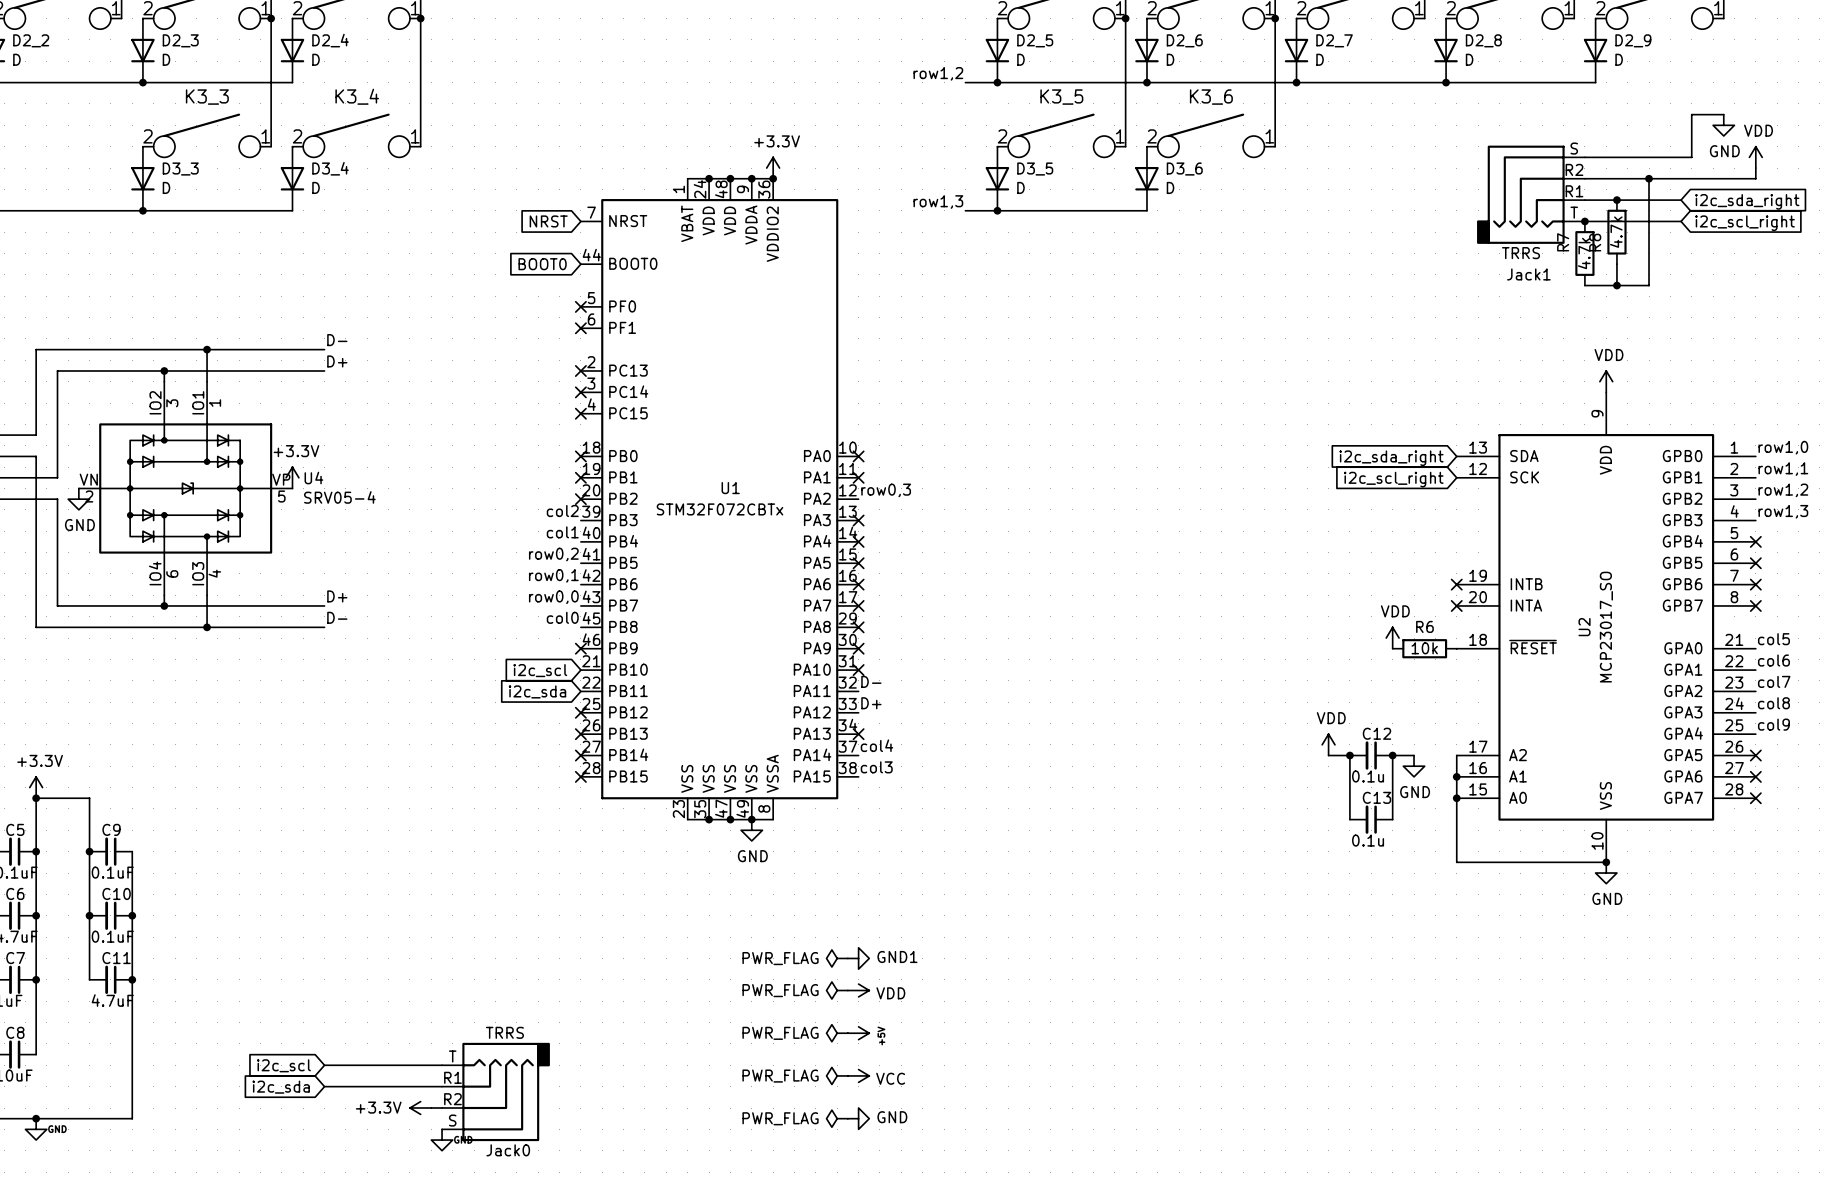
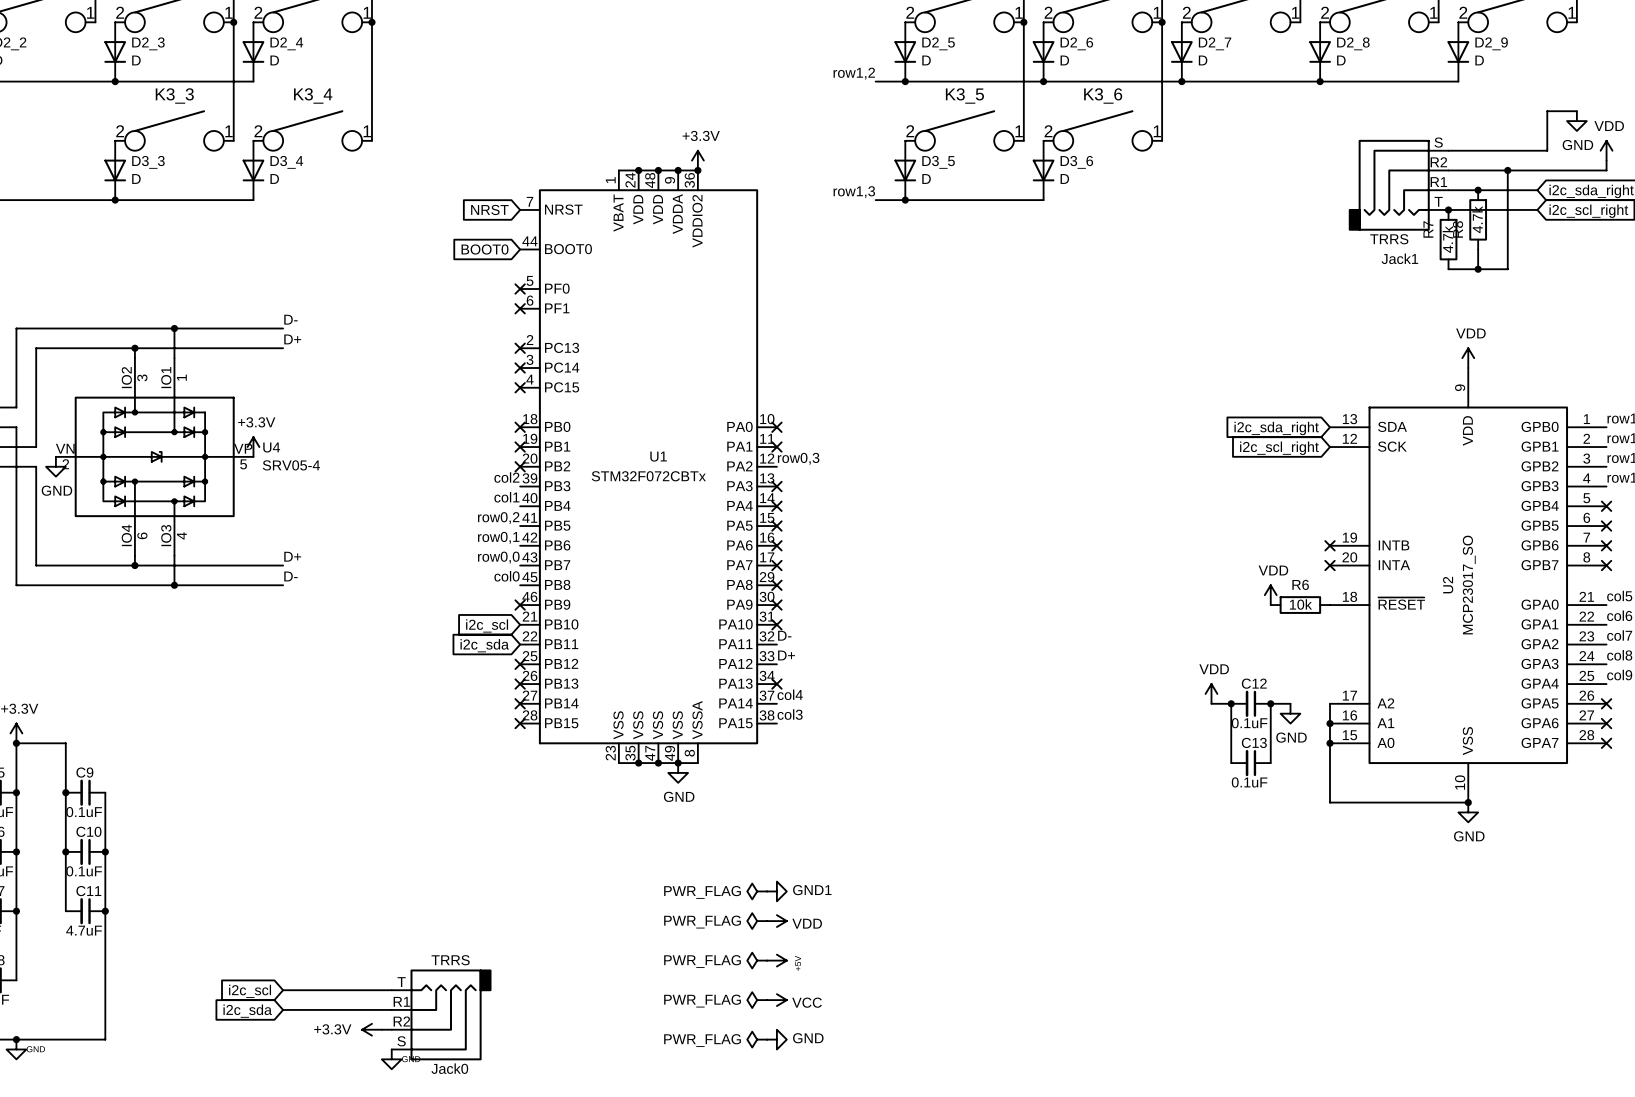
C12 value: 0.1u (1368, 776) -> 0.1uF (1249, 723)
C13 value: 0.1u (1368, 840) -> 0.1uF (1249, 782)

